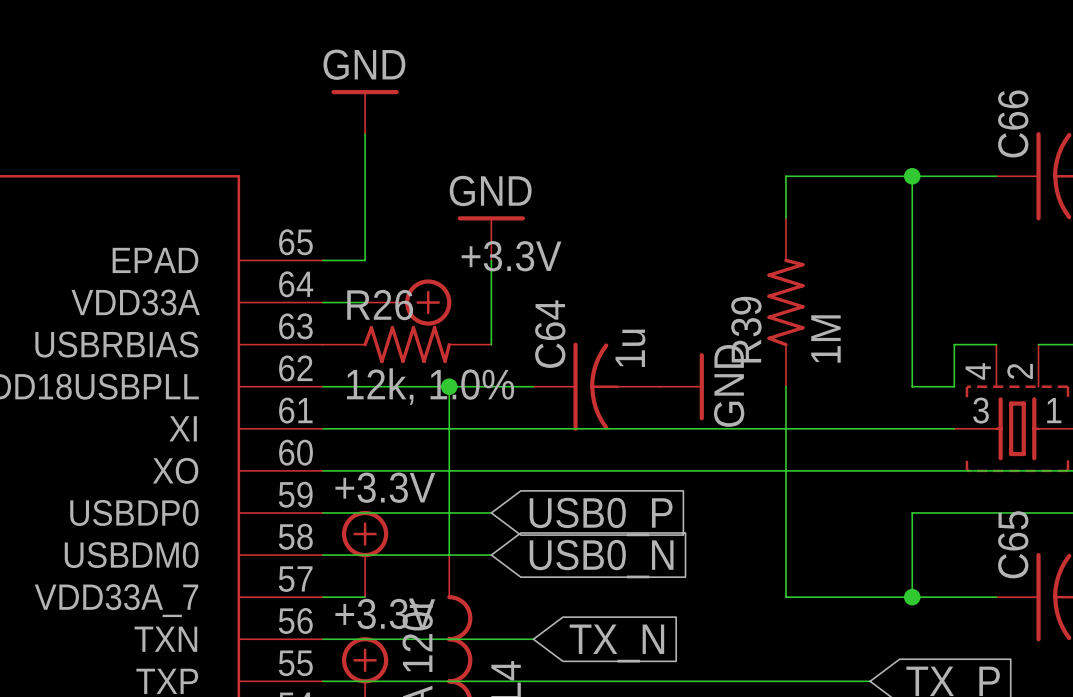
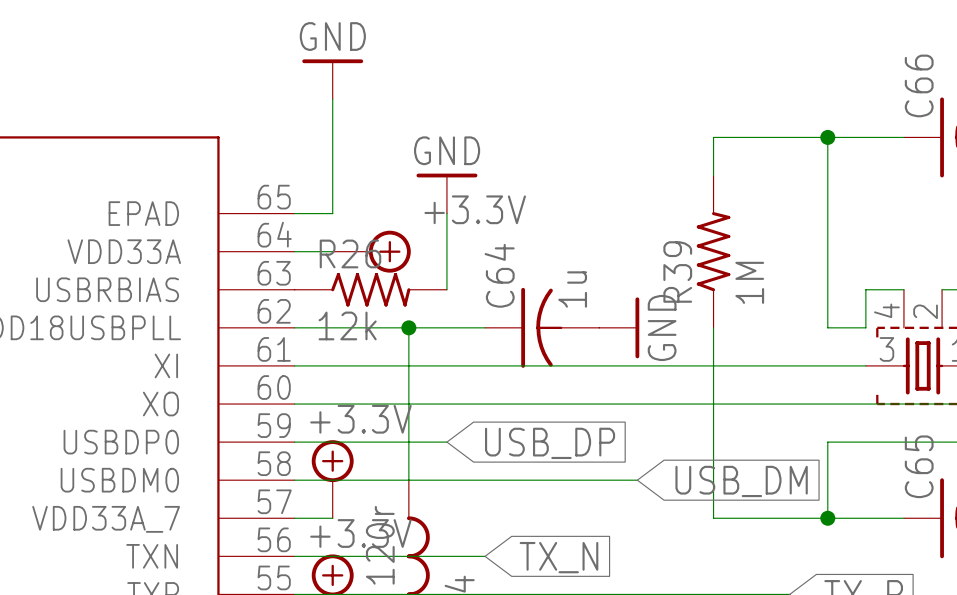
R26 value: 12k, 1.0% (430, 386) -> 12k (347, 325)
global label: USB0_P (601, 517) -> USB_DP (550, 443)
wire: none -> (446, 480) (637, 480)
global label: USB0_N (601, 559) -> USB_DM (741, 481)

